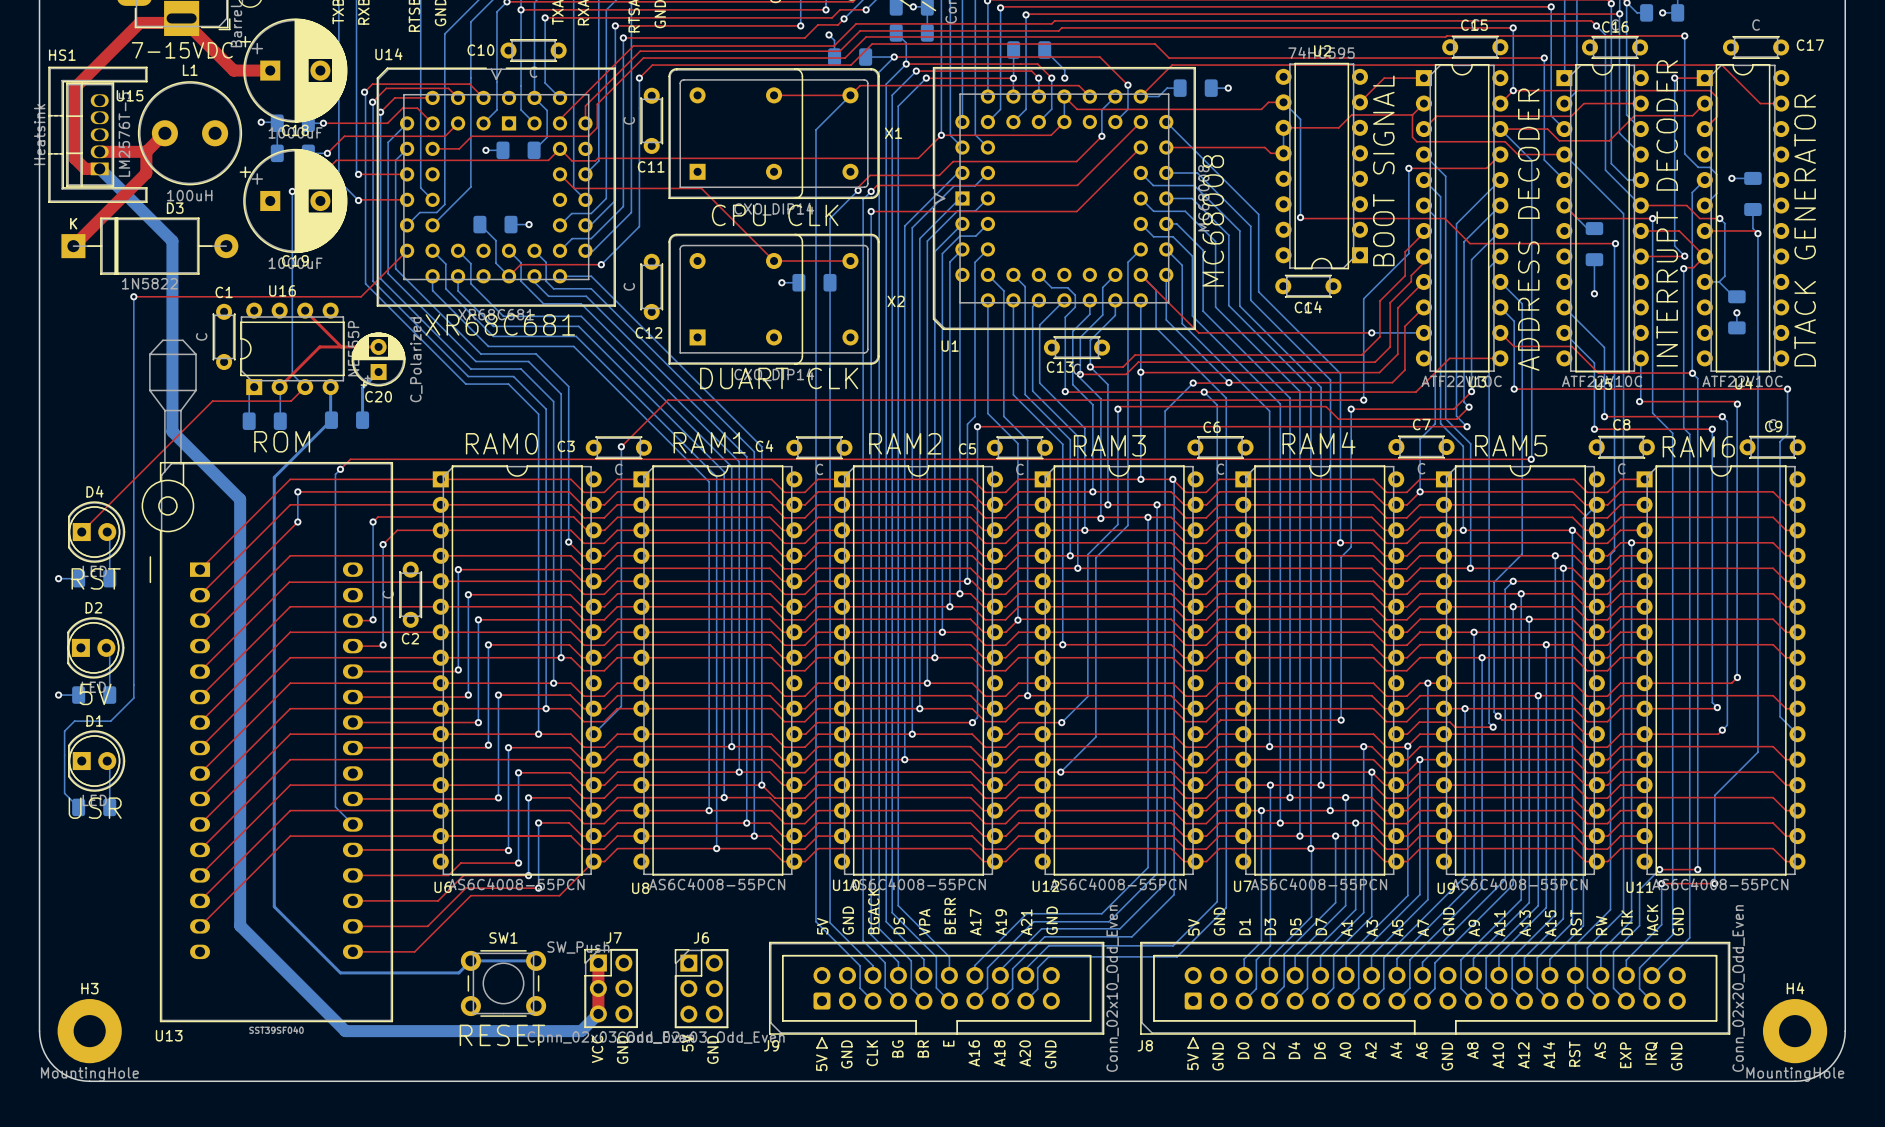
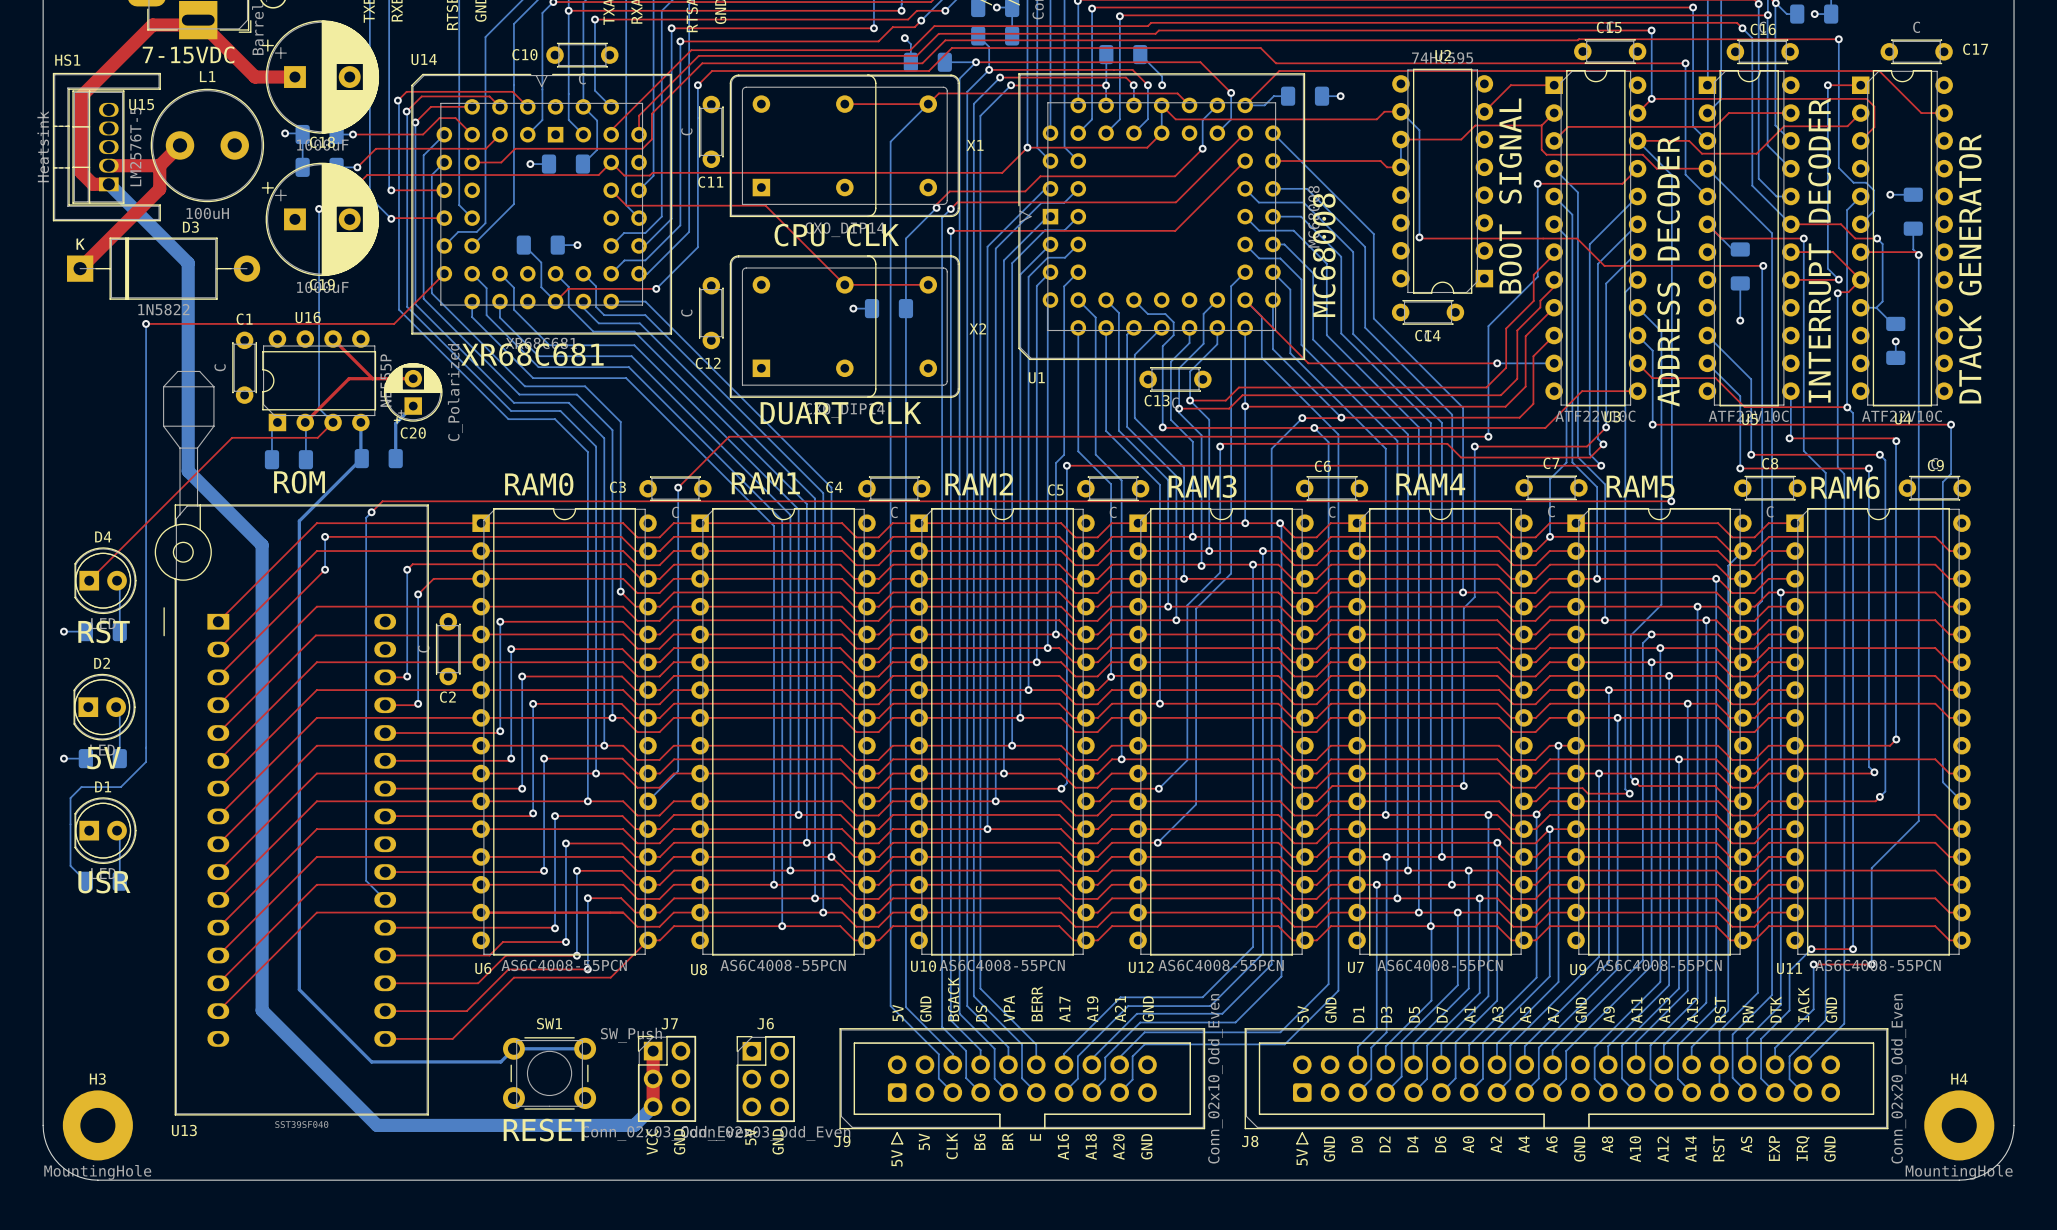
text: GND (846, 1054) -> 5V (924, 1141)

